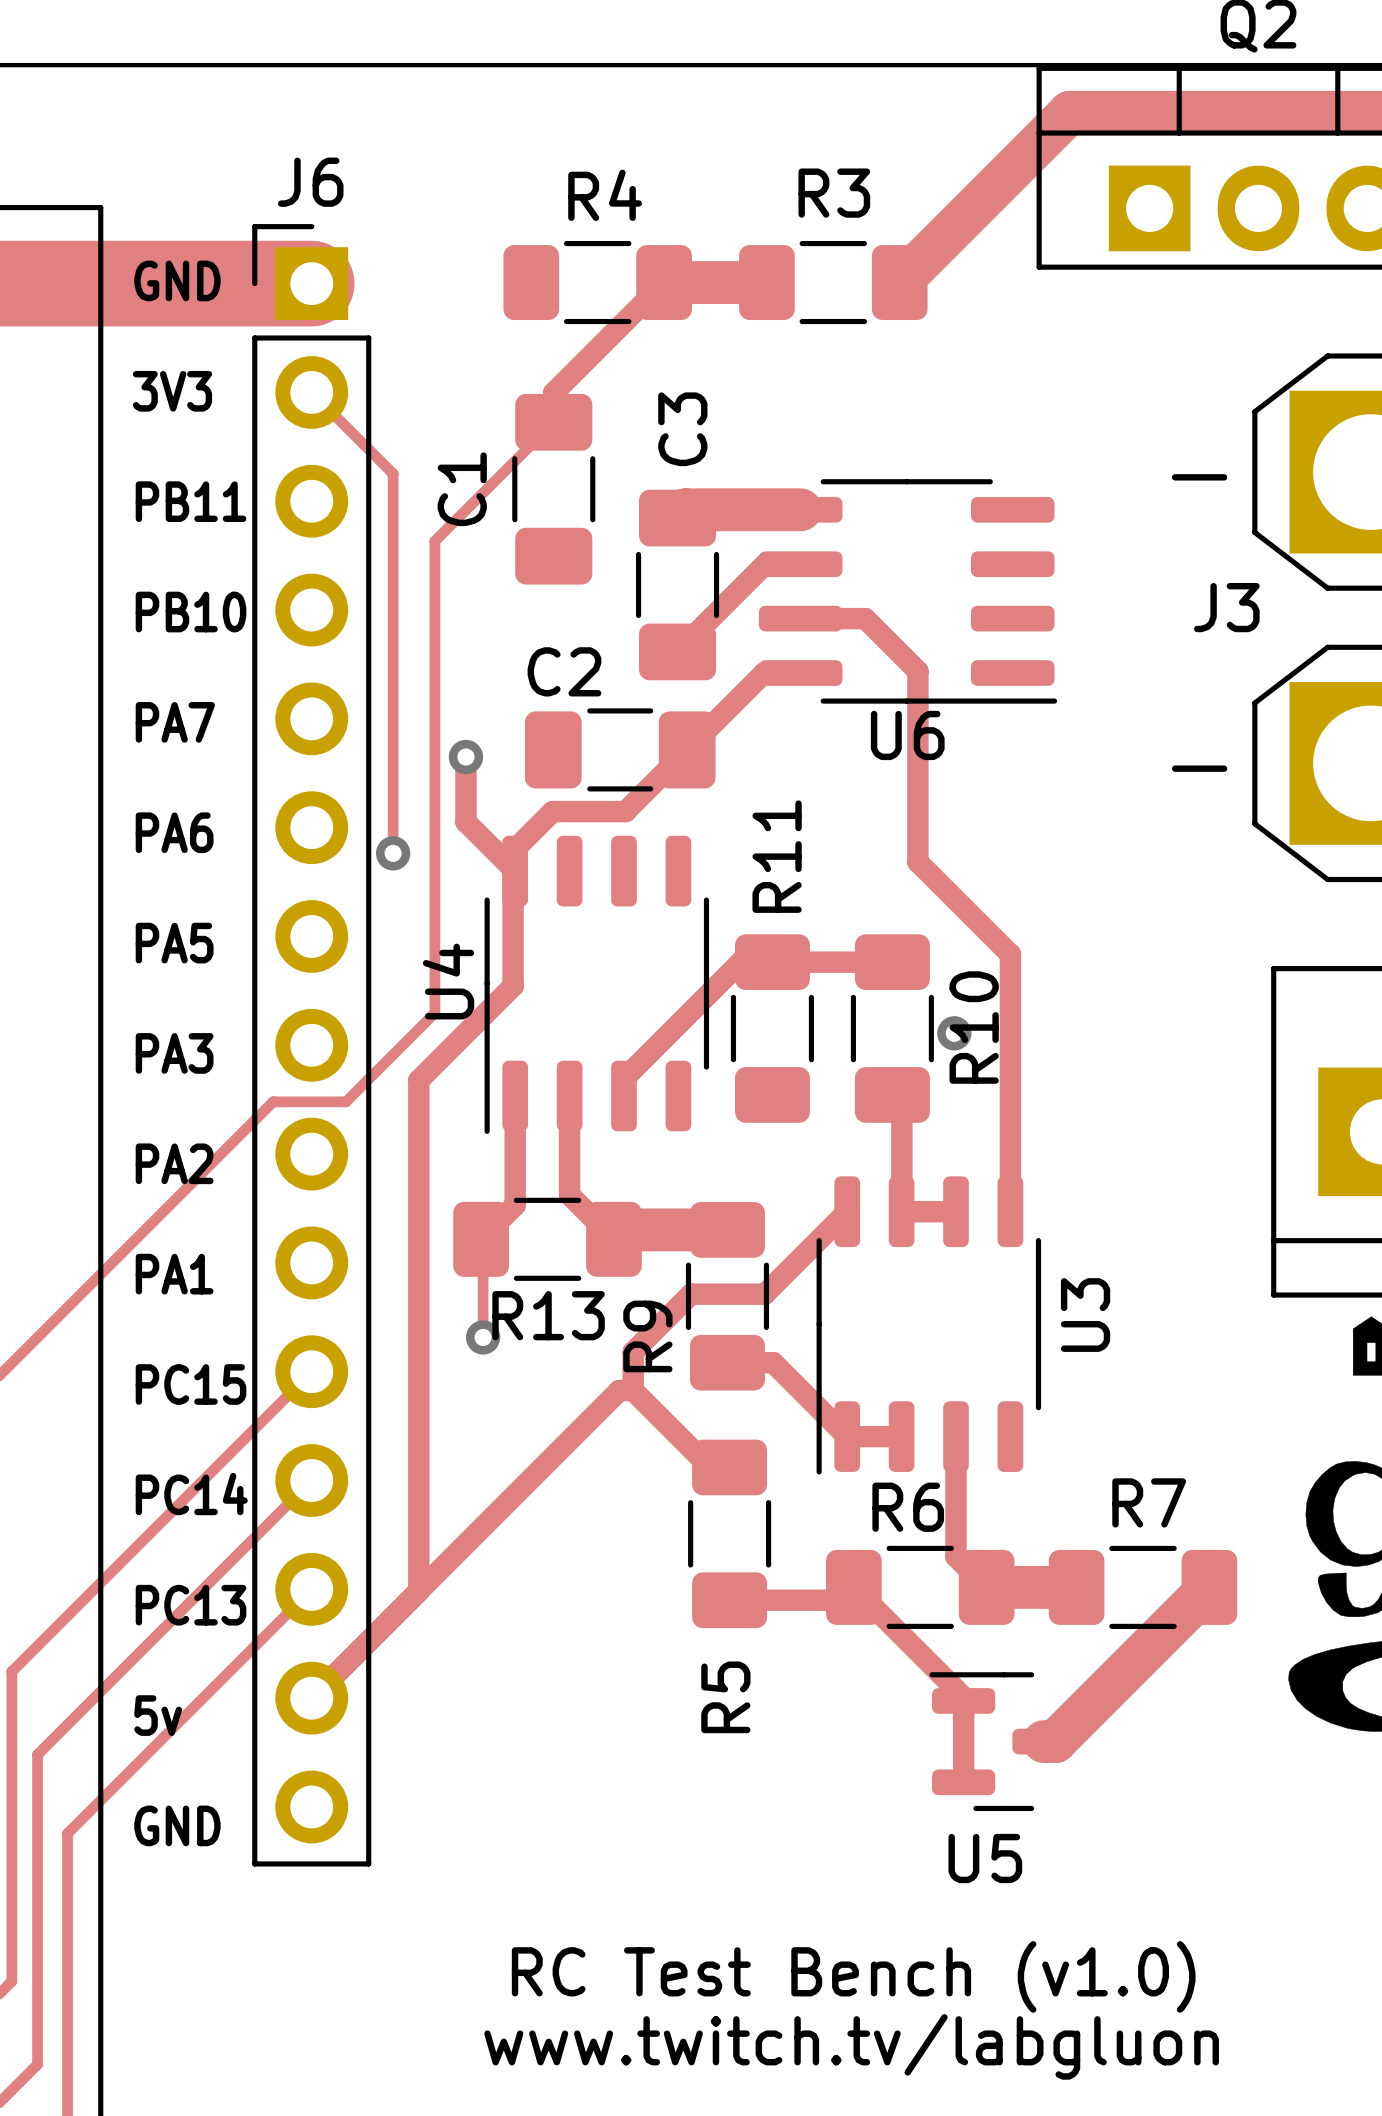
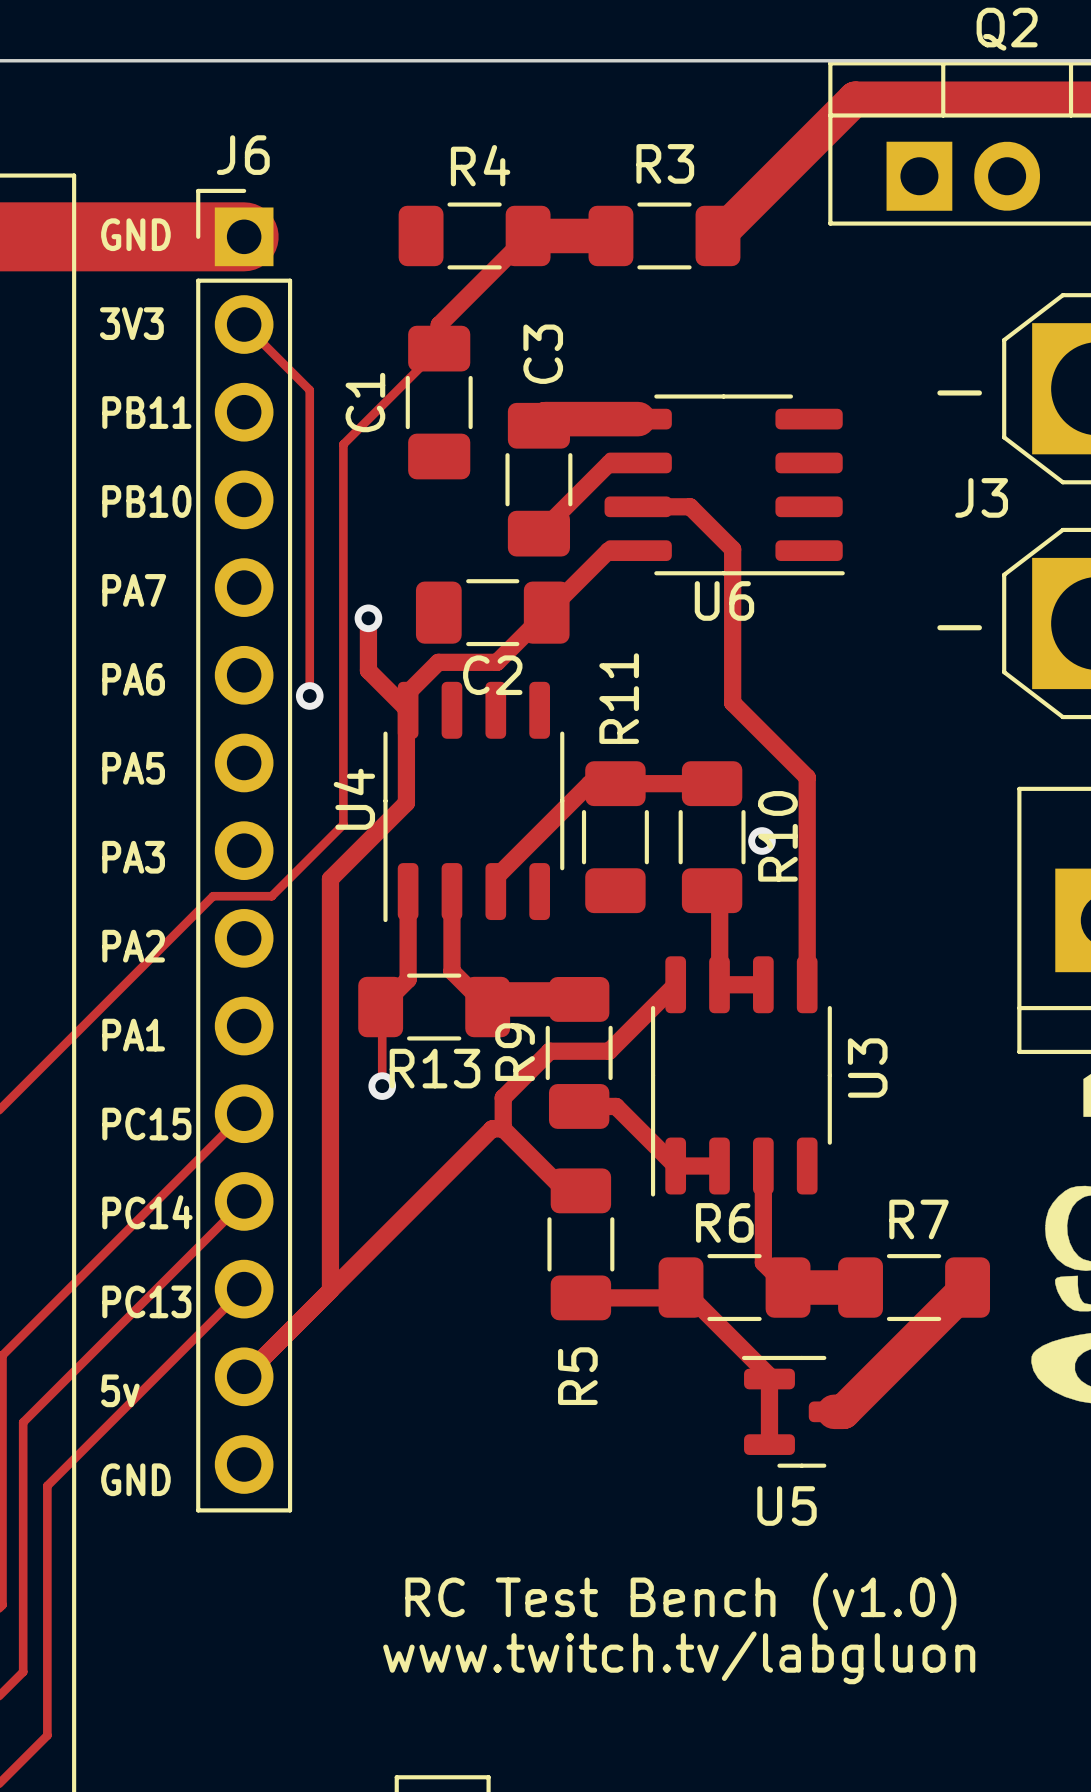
C2 name position: C2 (564, 671) -> C2 (492, 675)
R9 name position: R9 (647, 1336) -> R9 (515, 1052)

